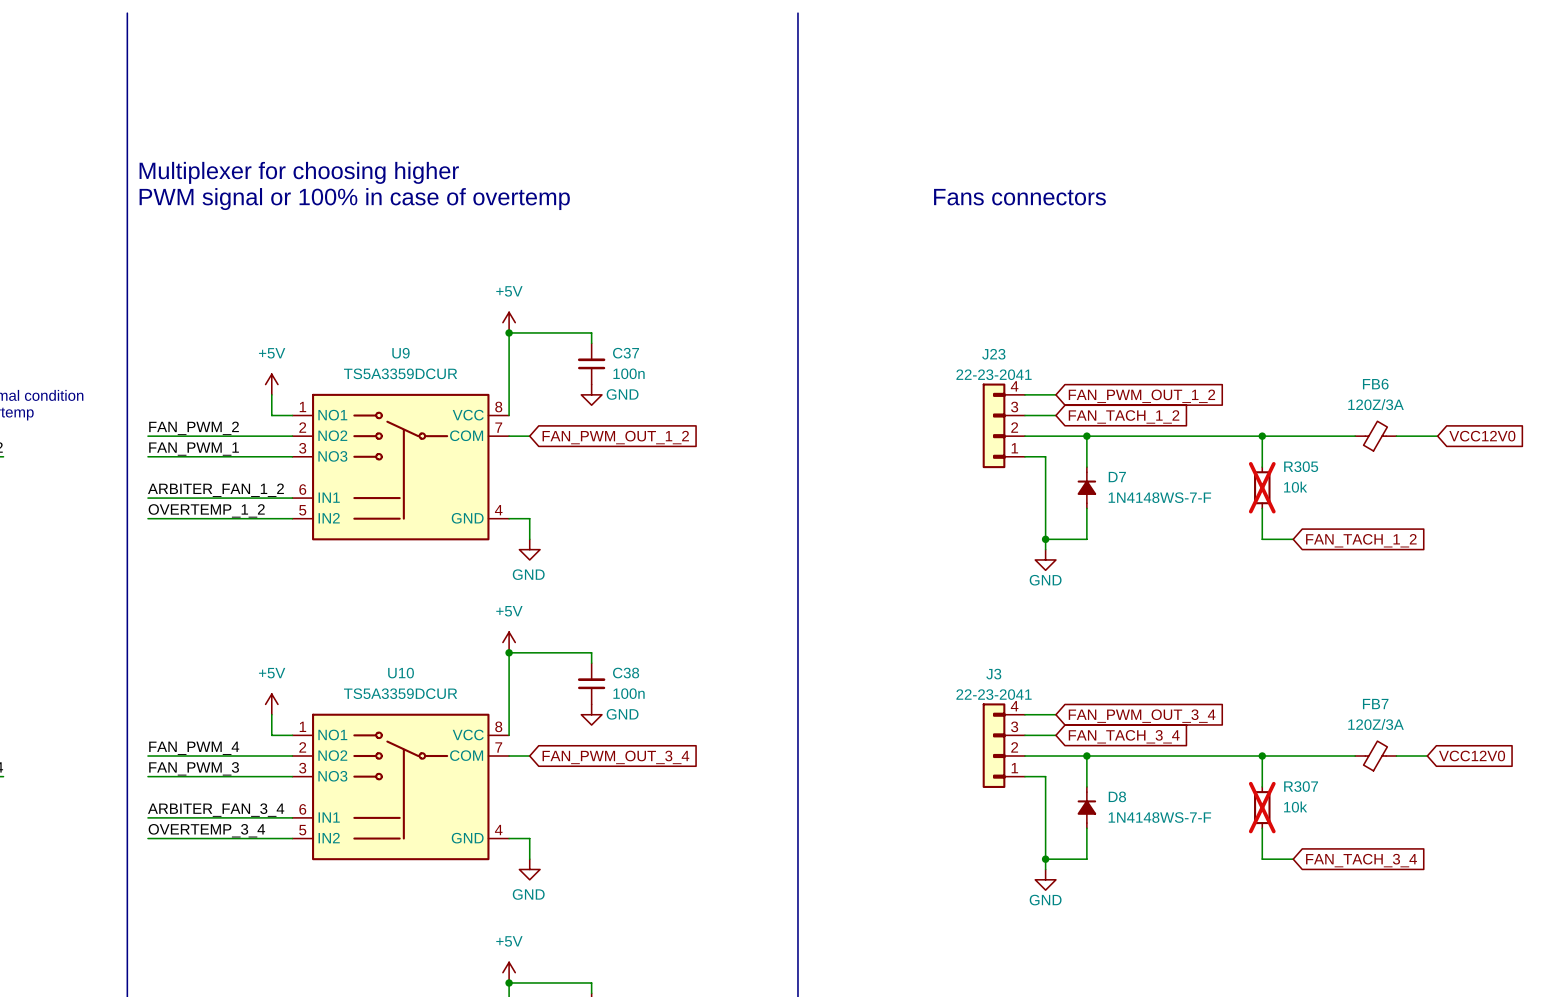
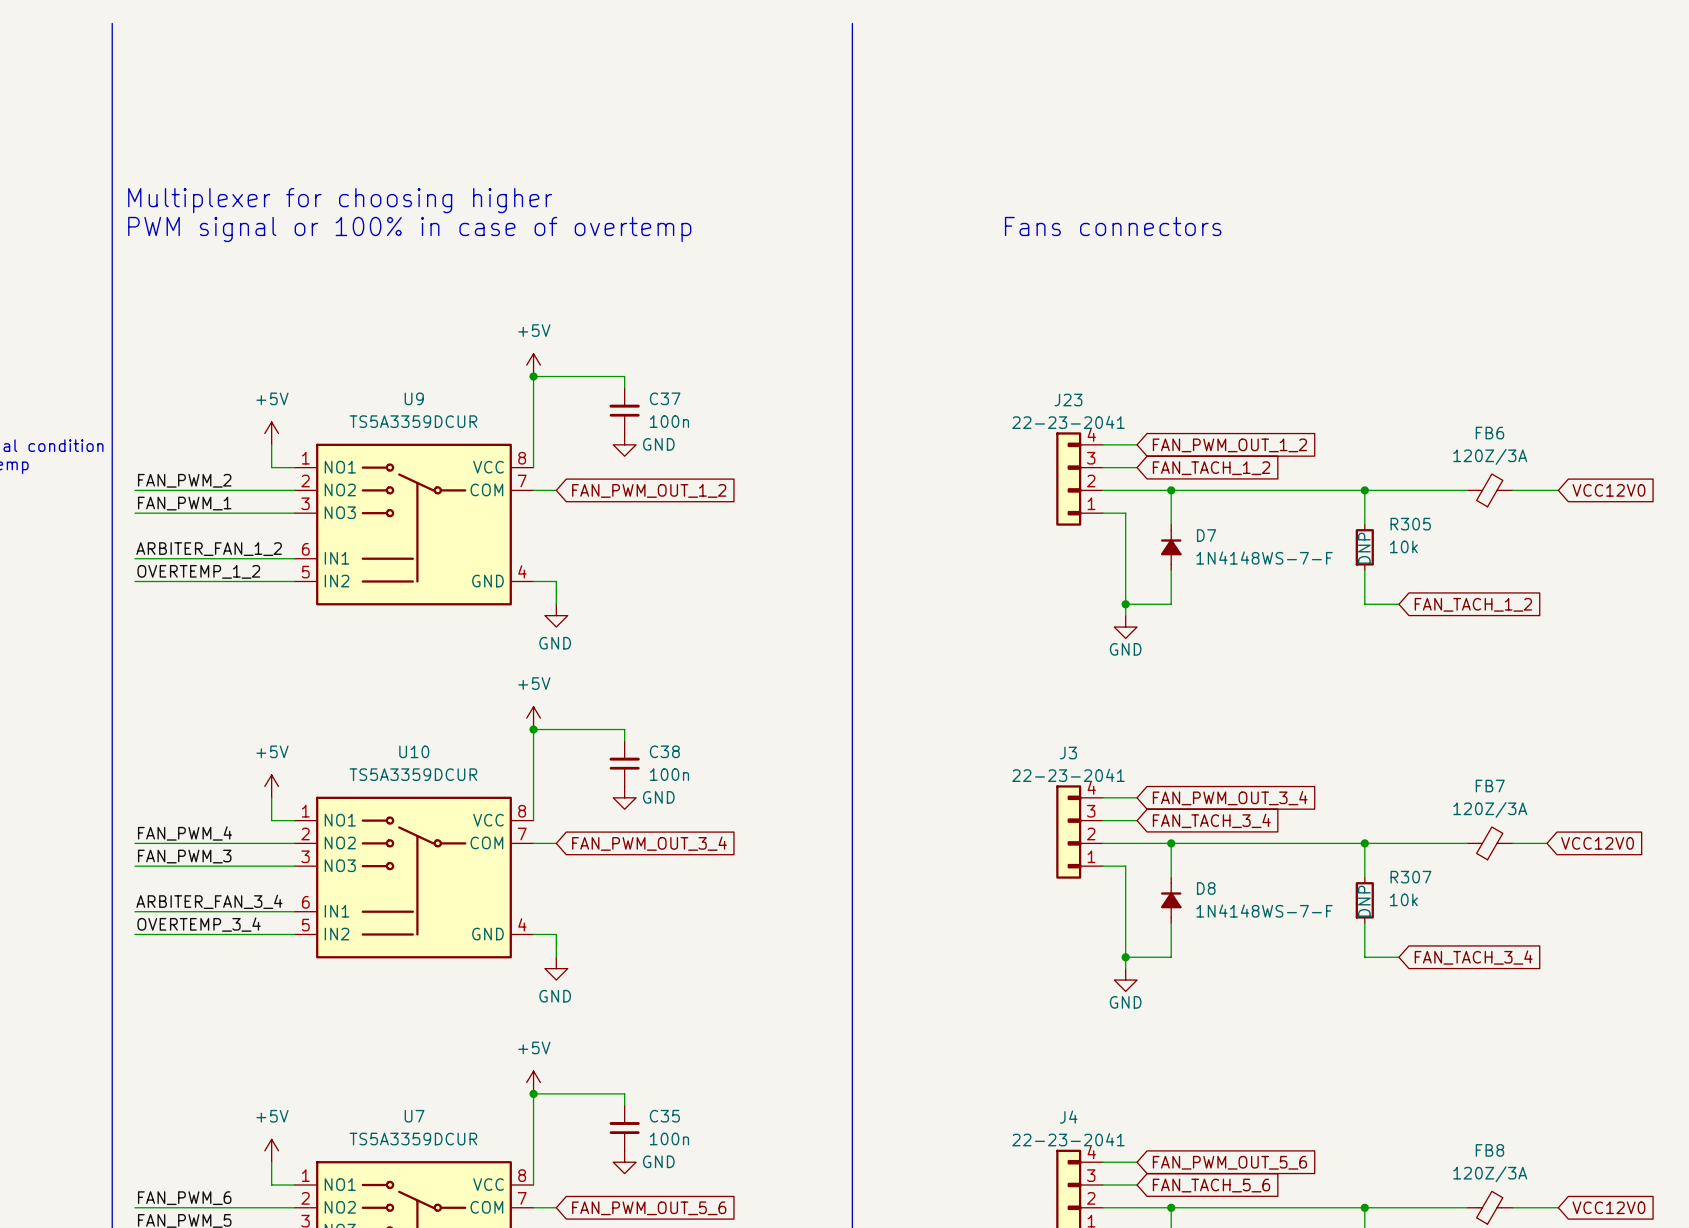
R305 text: none -> DNP (1364, 548)
R305 do-not-place cross: (1262, 487) -> none
R307 text: none -> DNP (1364, 901)
R307 do-not-place cross: (1262, 807) -> none

